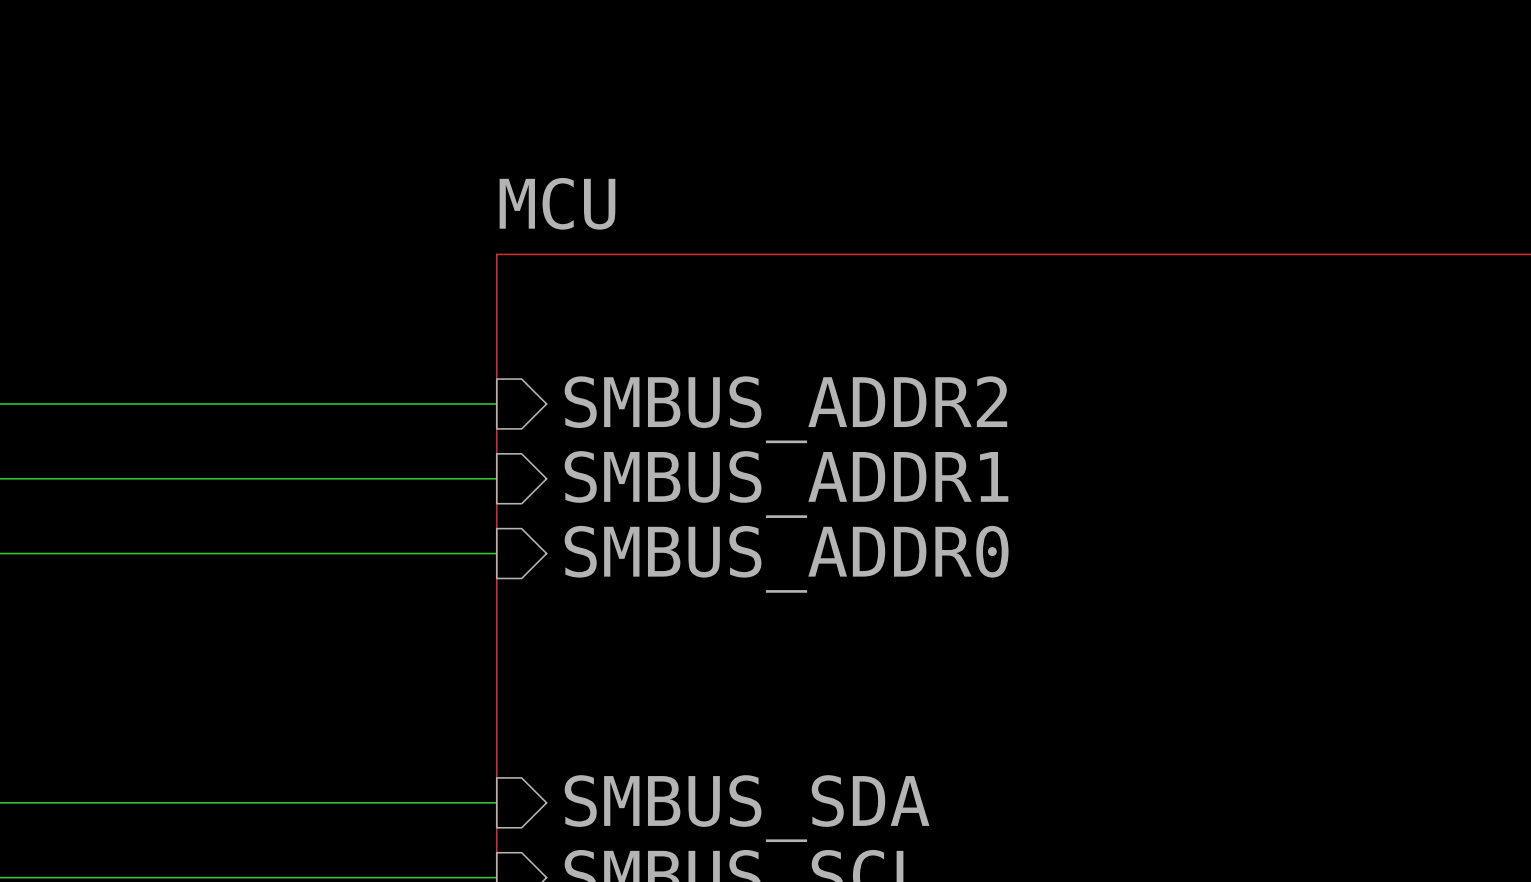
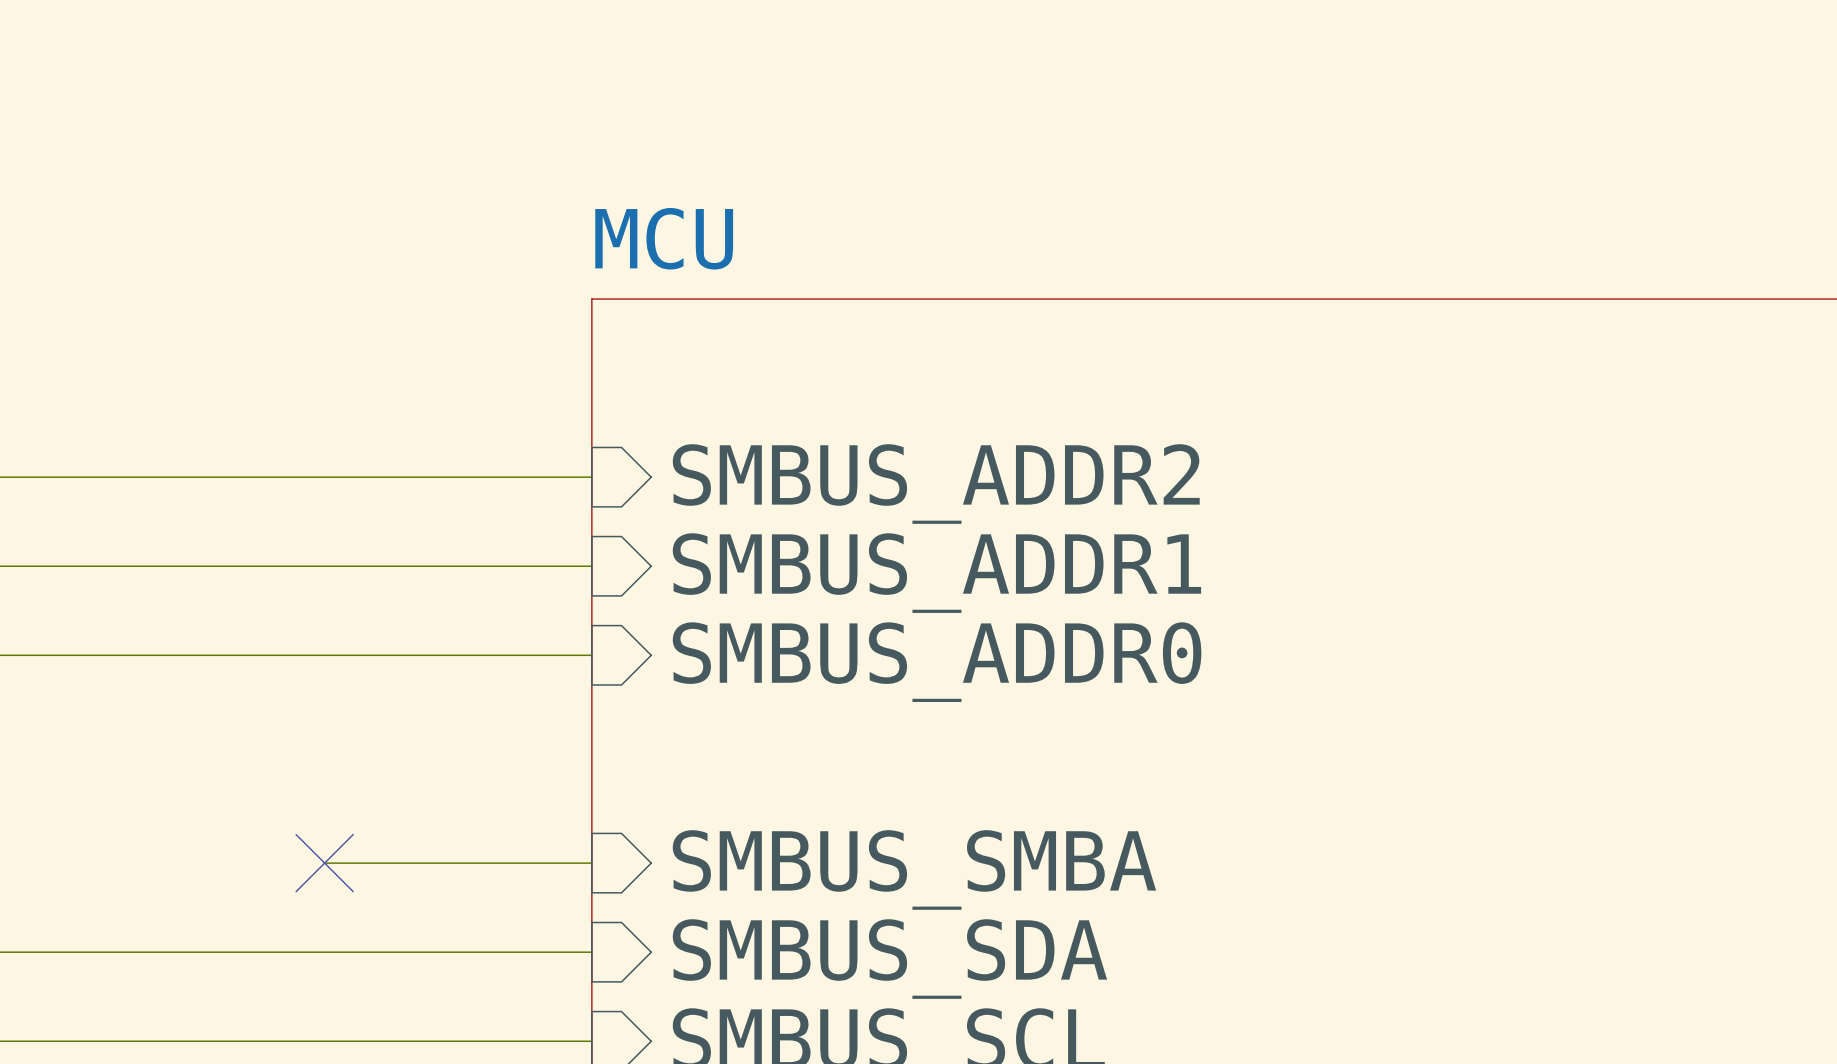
wire: none -> (324, 863) (591, 863)
no-connect mark: none -> (324, 863)
sheet pin: none -> SMBUS_SMBA (914, 869)

